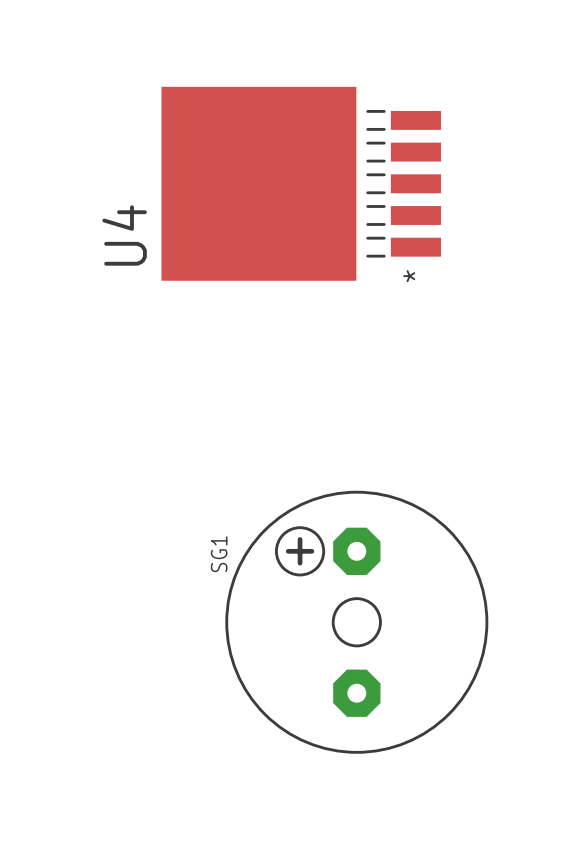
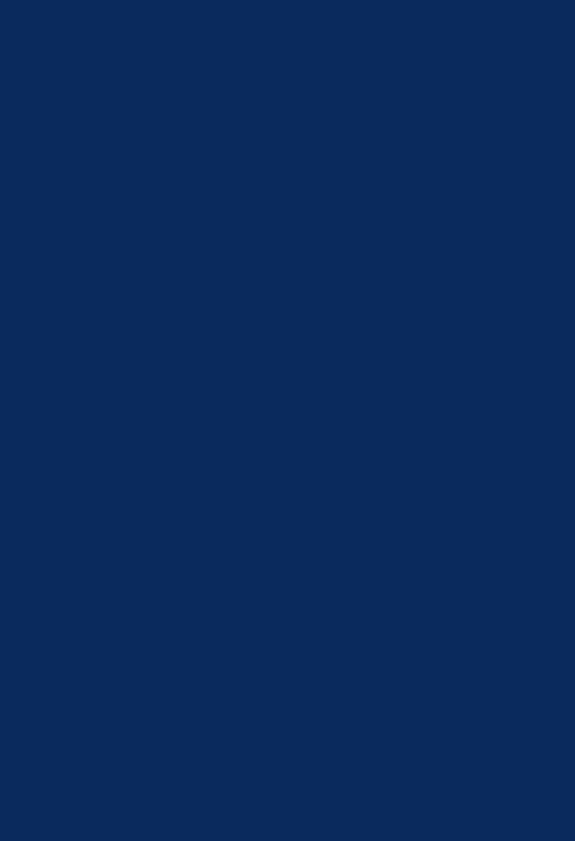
U4: (301, 183) -> none
SG1: (356, 622) -> none

